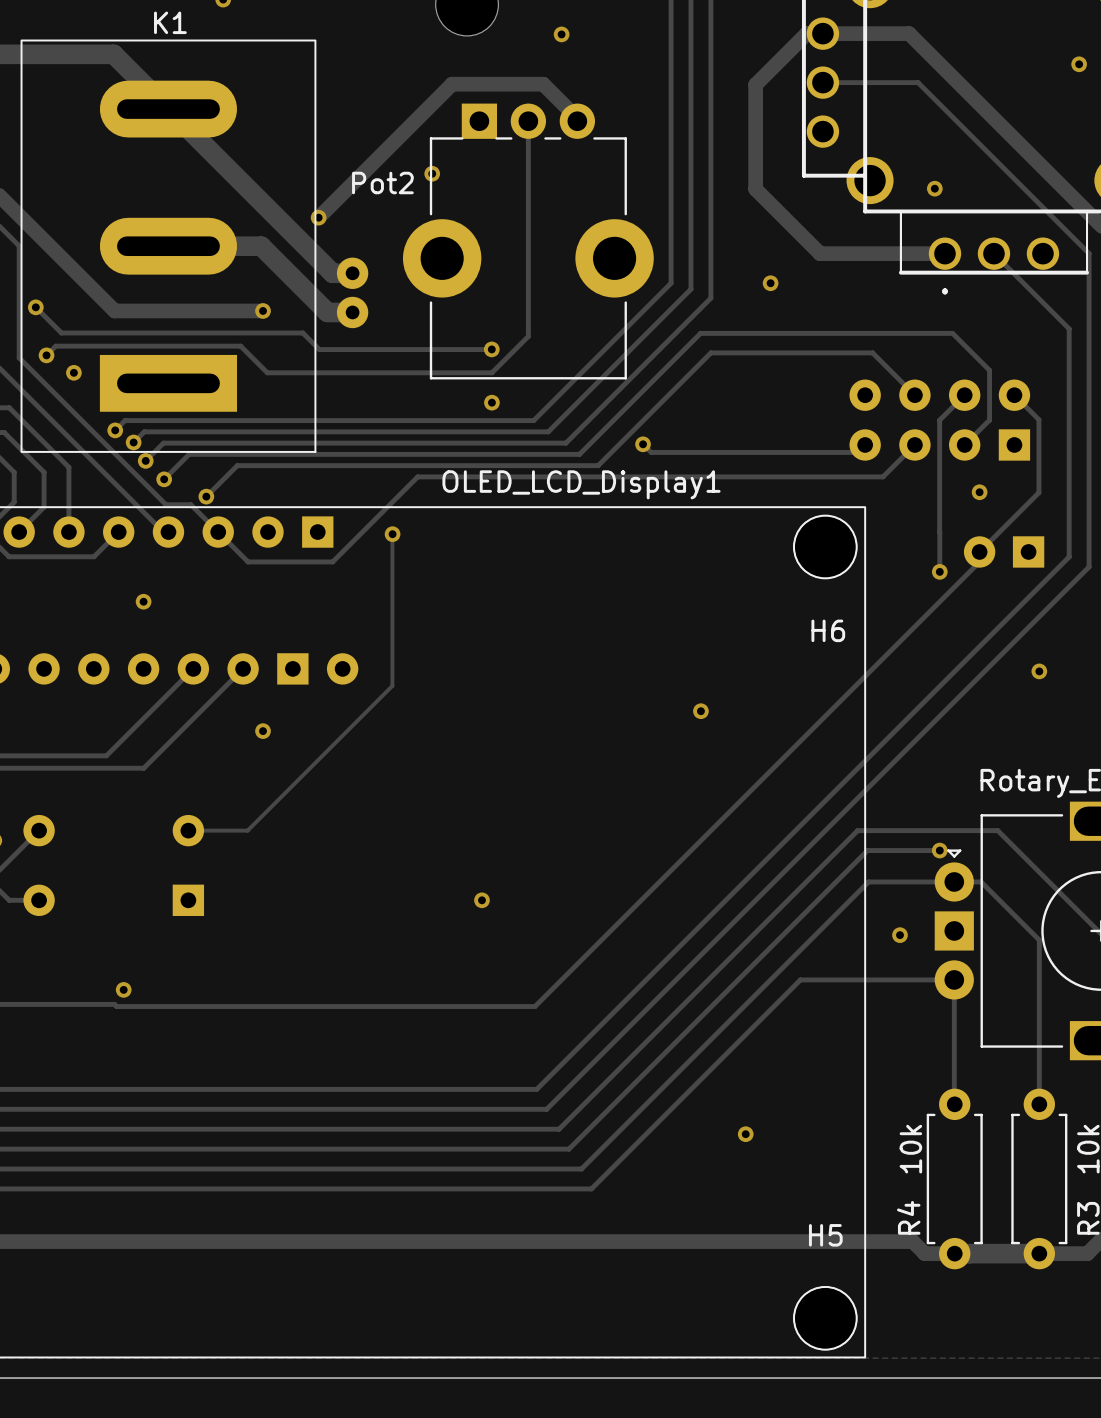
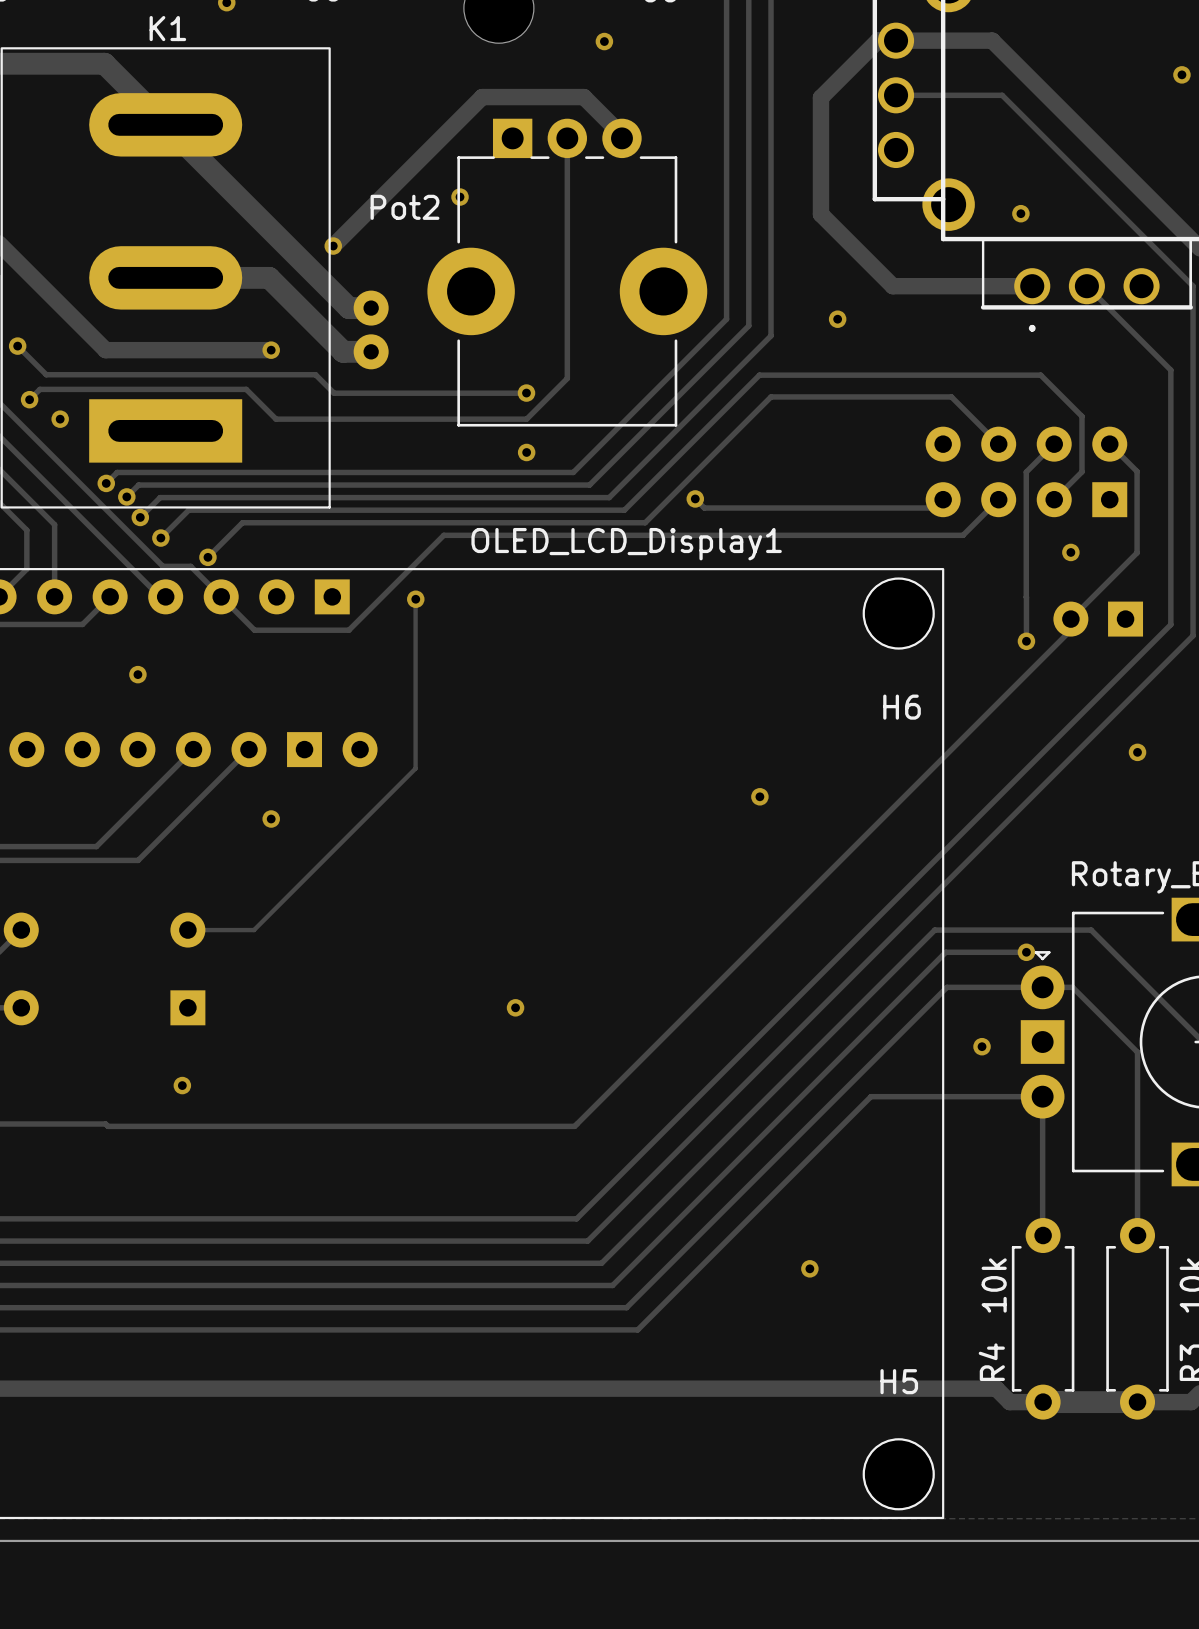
via position: (123, 989) -> (182, 1085)

